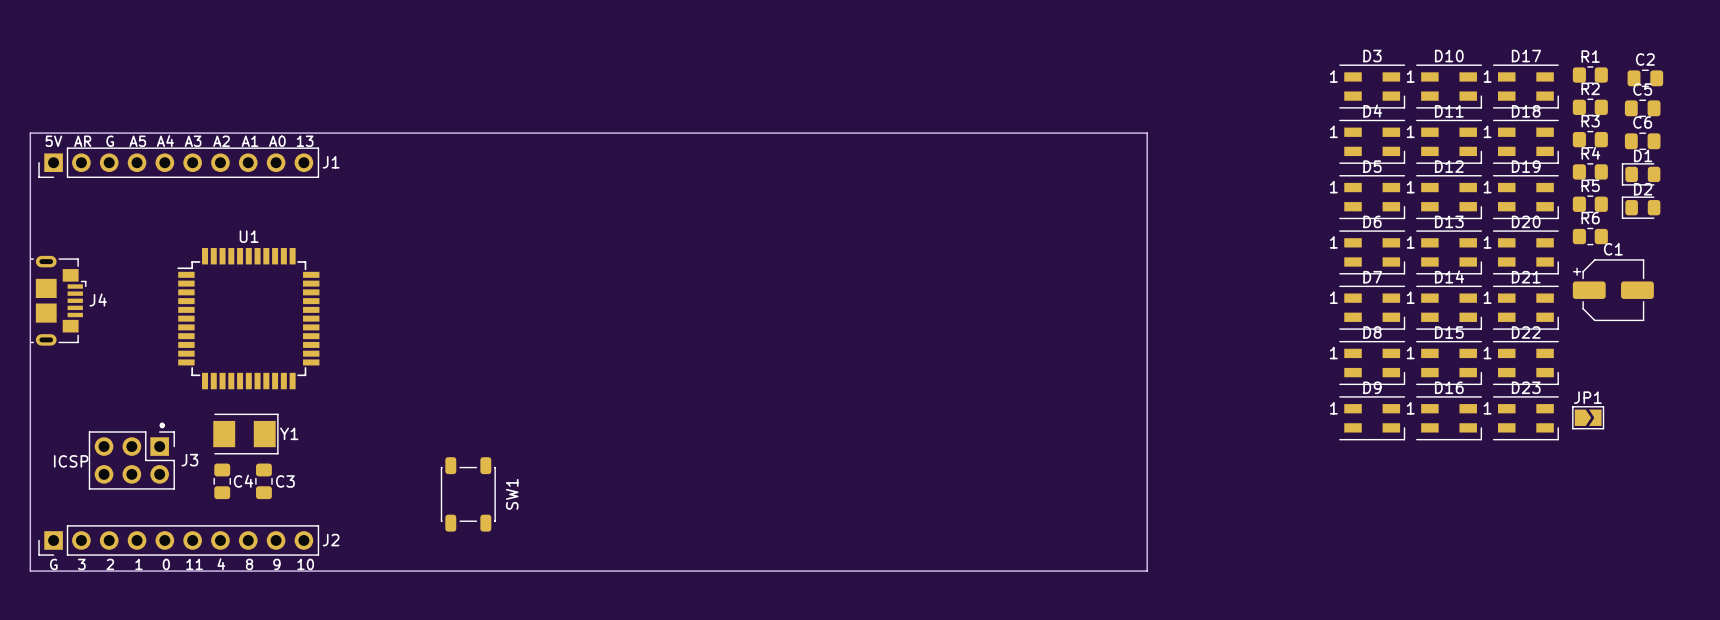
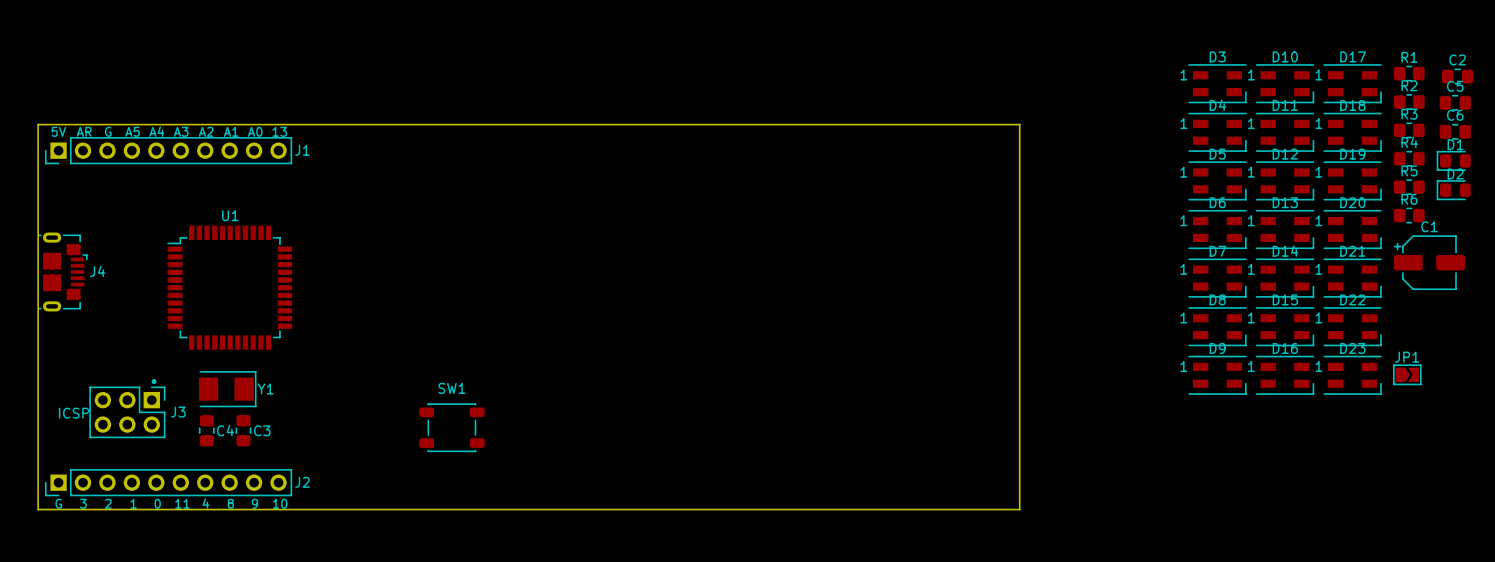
SW1 rotation: 0° (468, 494) -> 90° clockwise (451, 427)
SW1 name position: SW1 (512, 494) -> SW1 (451, 388)

